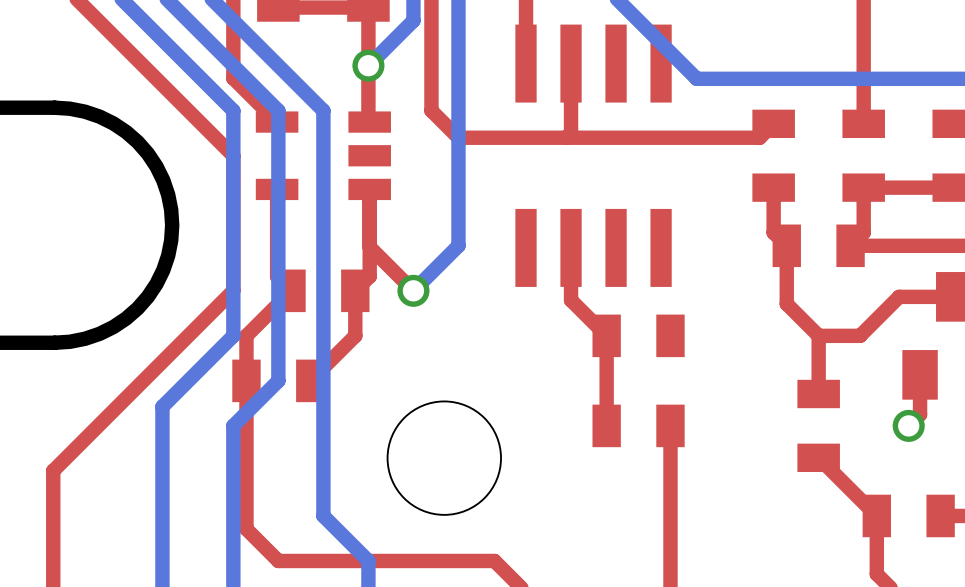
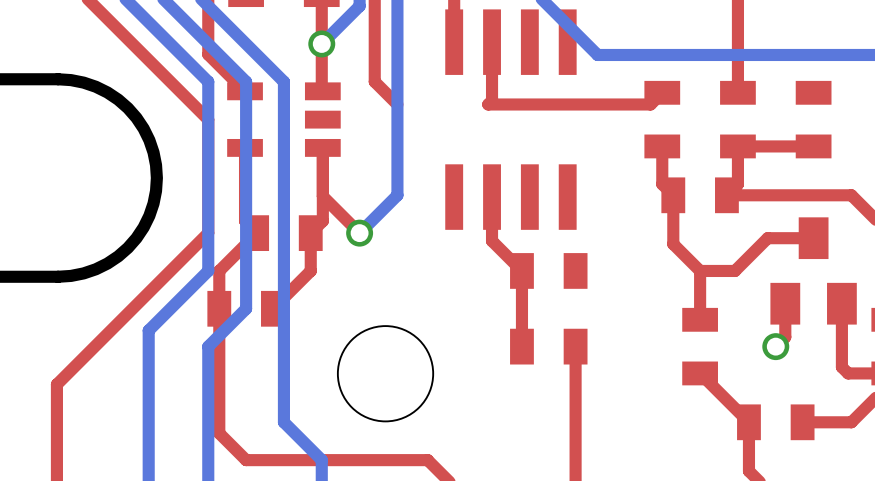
top track: (566, 137) (458, 137) -> none

